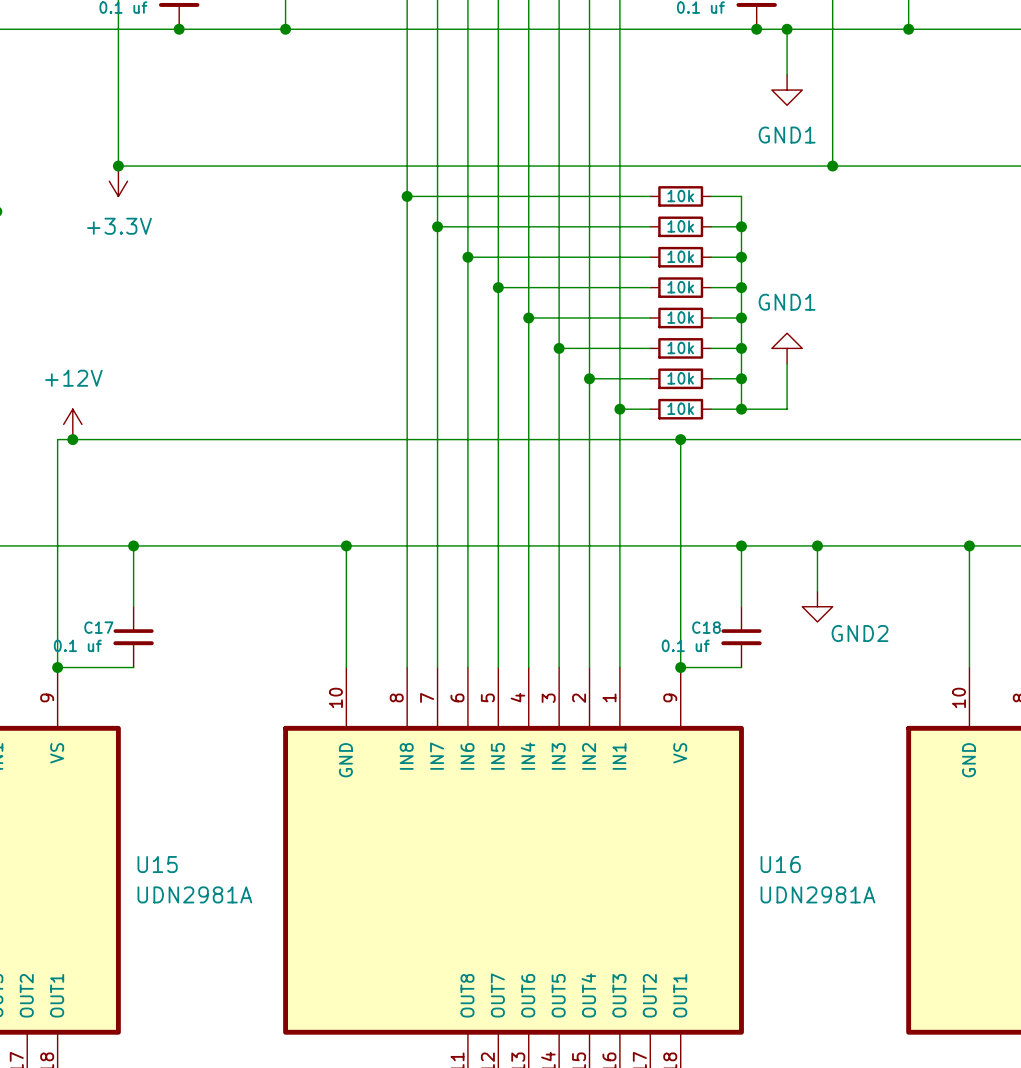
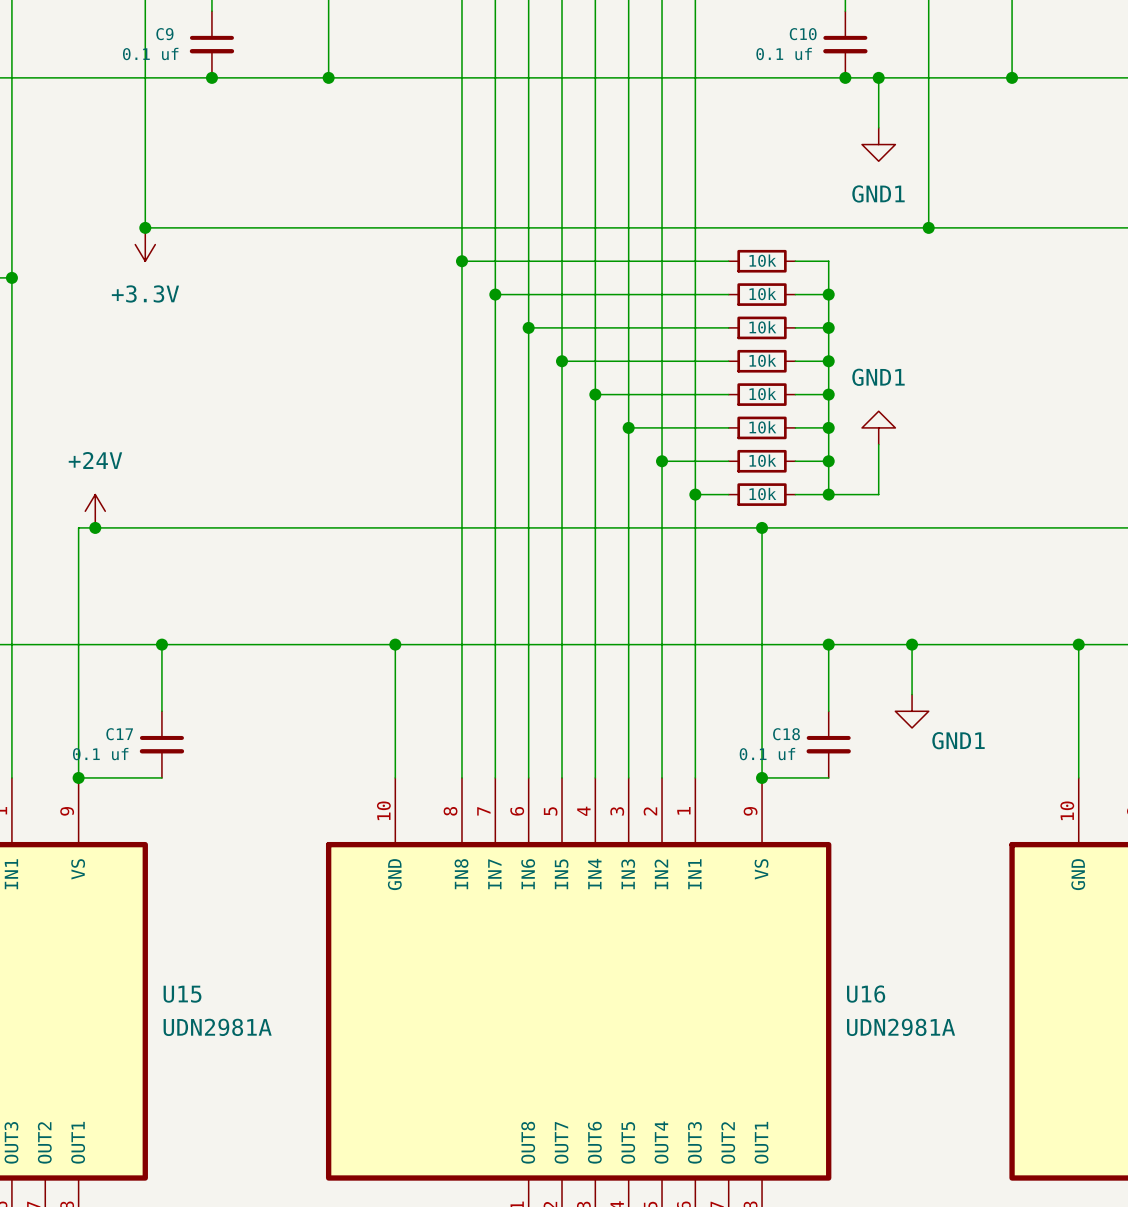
power symbol: +12V (72, 424) -> +24V (95, 511)
power symbol: GND2 (817, 606) -> GND1 (912, 711)

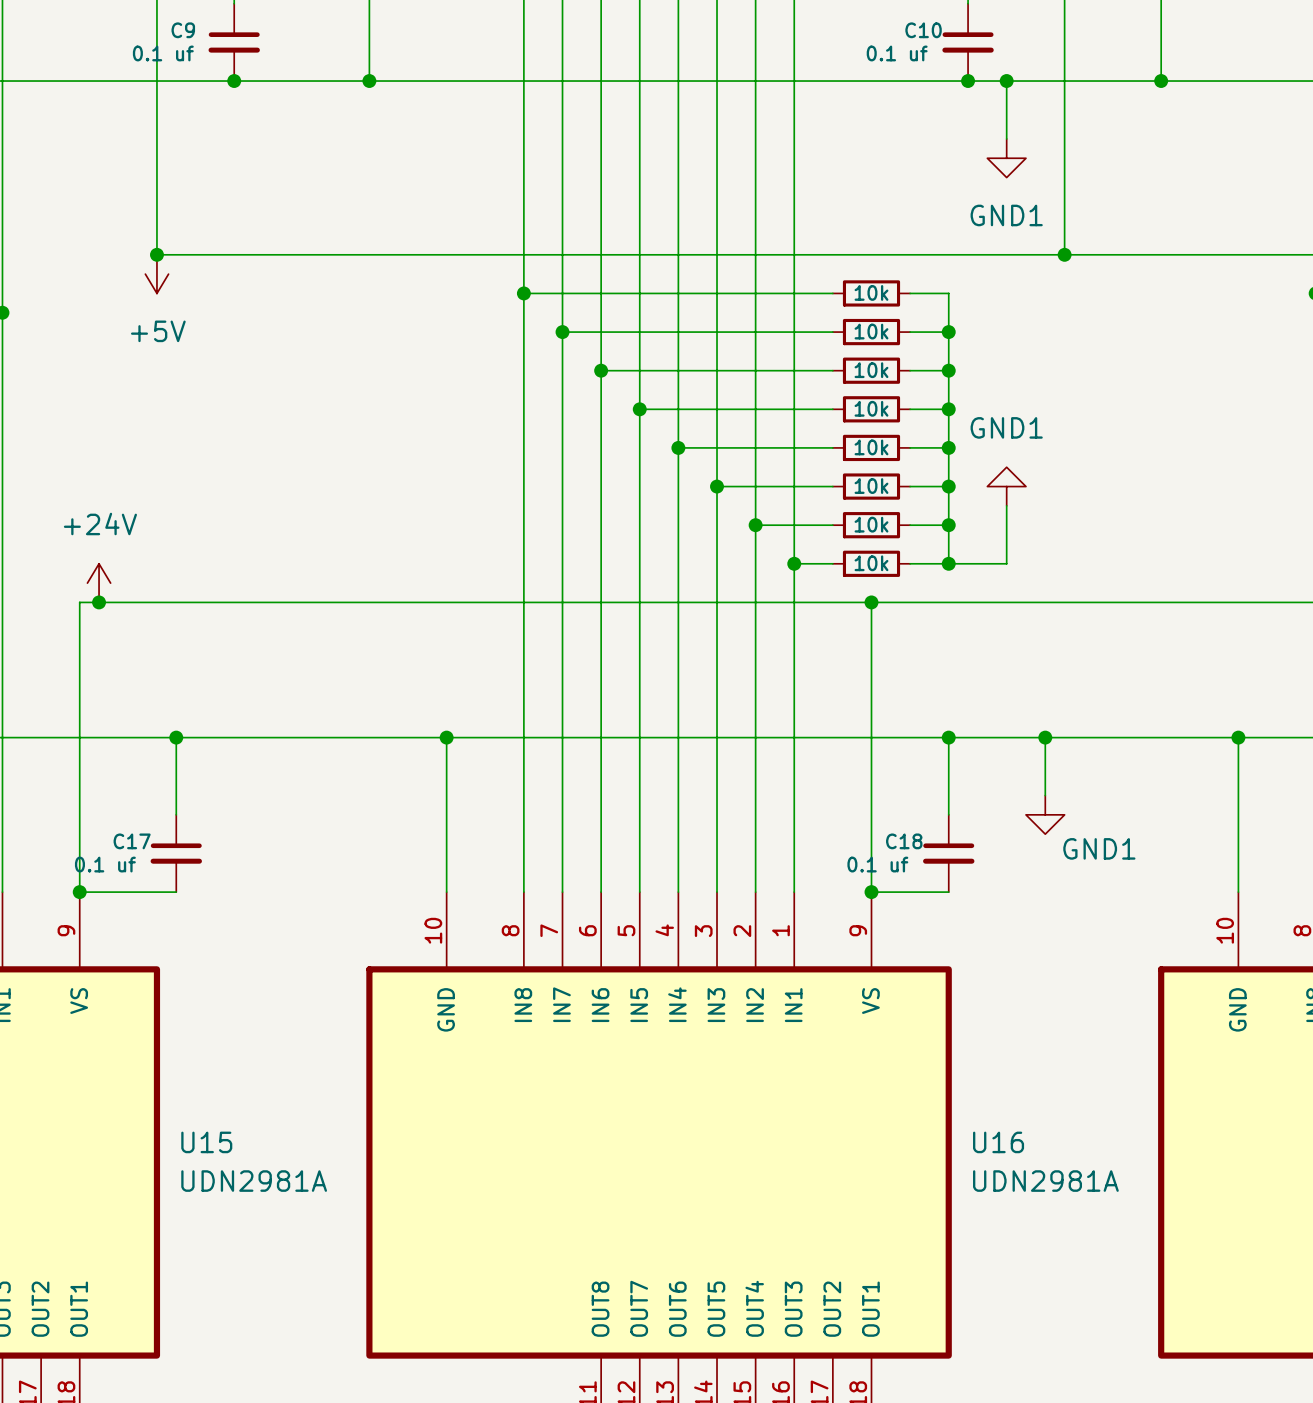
power symbol: +3.3V (145, 244) -> +5V (156, 274)

